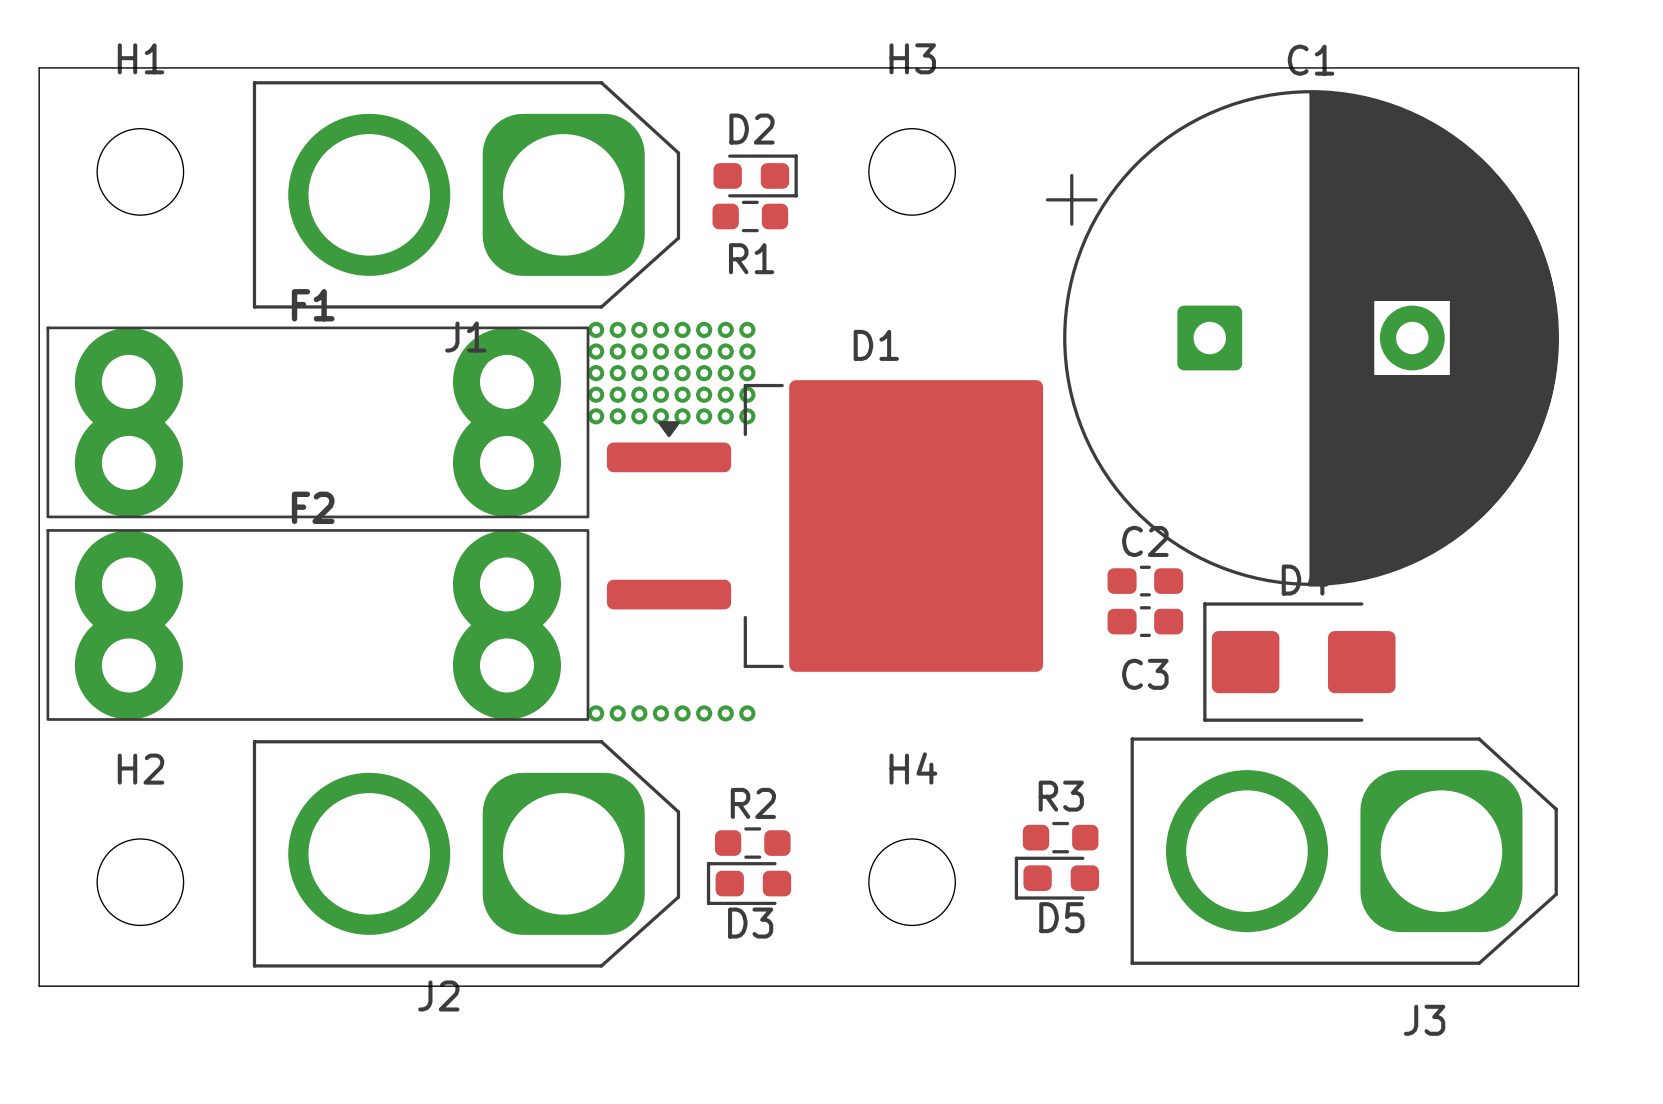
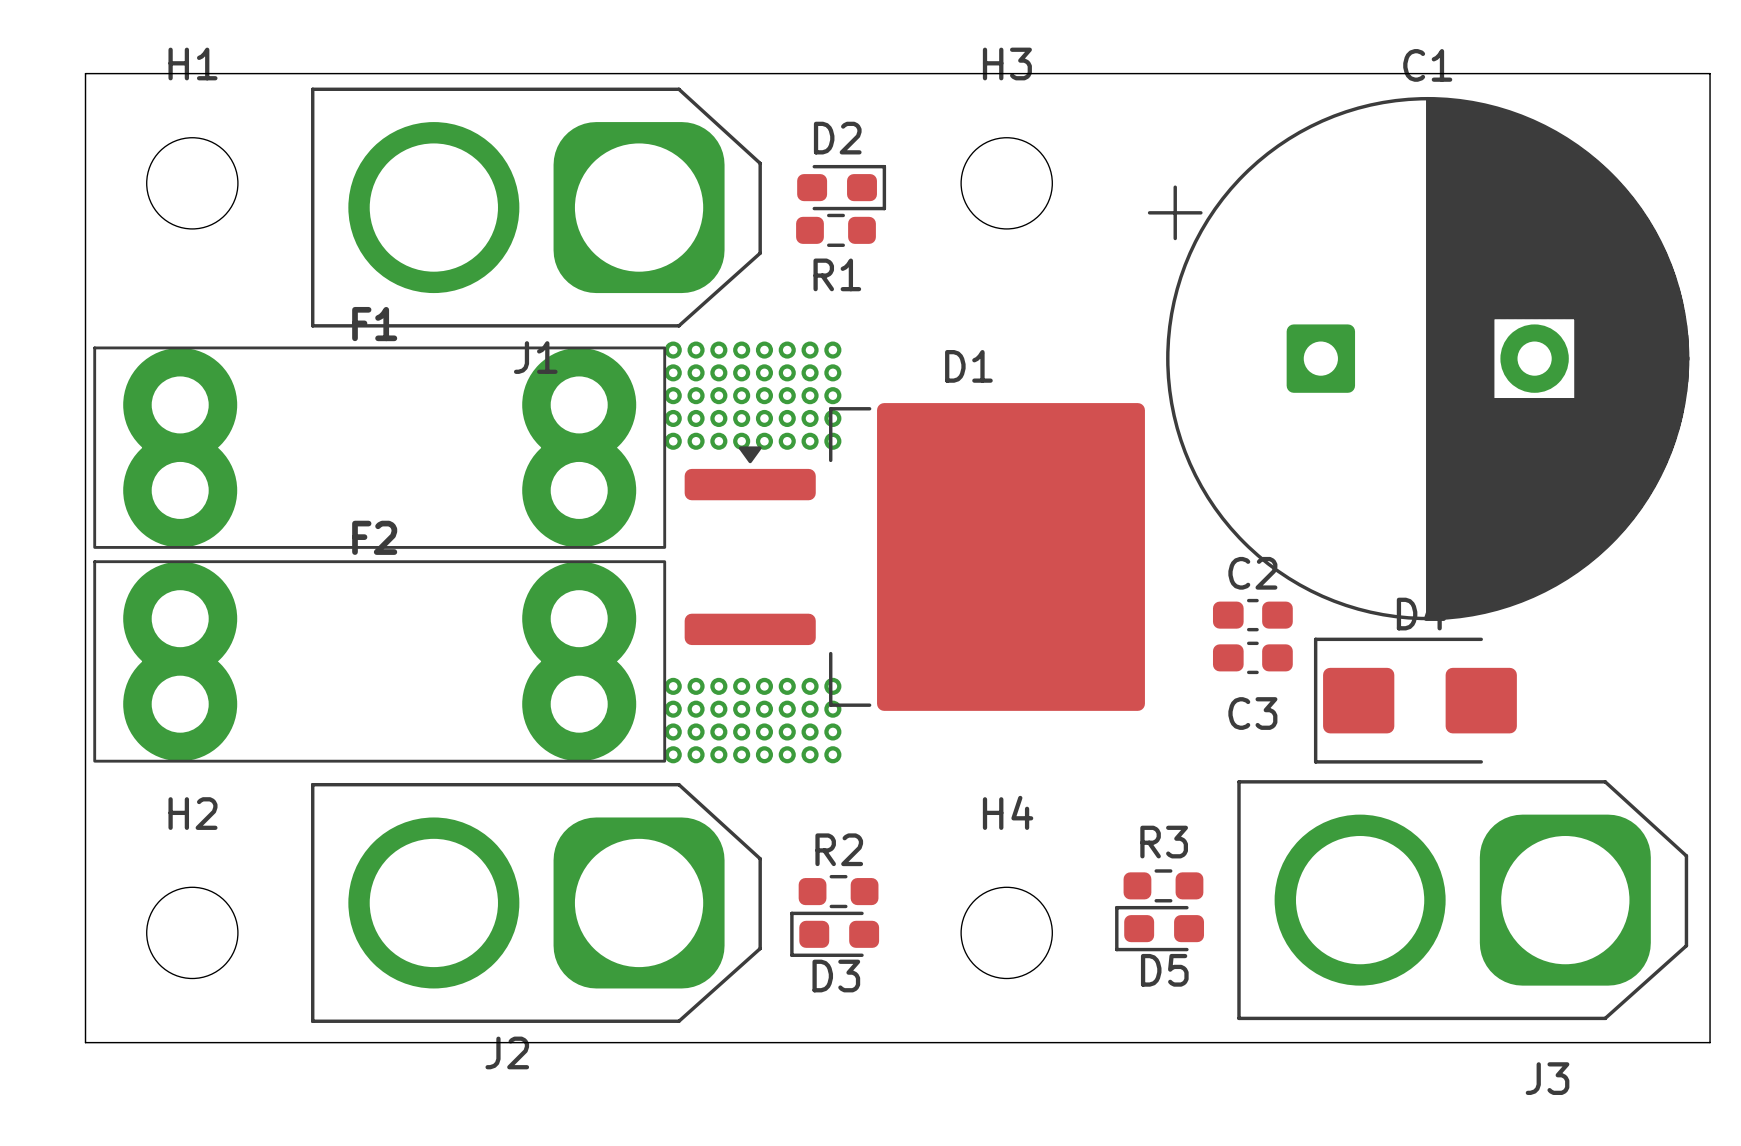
via: none -> (673, 686)
via: none -> (696, 686)
via: none -> (718, 686)
via: none -> (741, 686)
via: none -> (764, 686)
via: none -> (787, 686)
via: none -> (810, 686)
via: none -> (832, 686)
via: none -> (673, 709)
via: none -> (696, 709)
via: none -> (718, 709)
via: none -> (741, 709)
via: none -> (764, 709)
via: none -> (787, 709)
via: none -> (810, 709)
via: none -> (832, 709)
via: none -> (673, 731)
via: none -> (696, 731)
via: none -> (718, 731)
via: none -> (741, 731)
via: none -> (764, 731)
via: none -> (787, 731)
via: none -> (810, 731)
via: none -> (832, 731)

